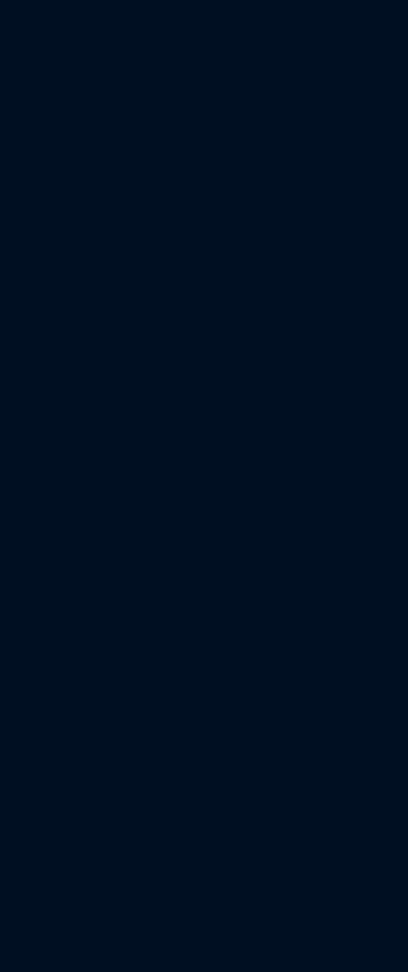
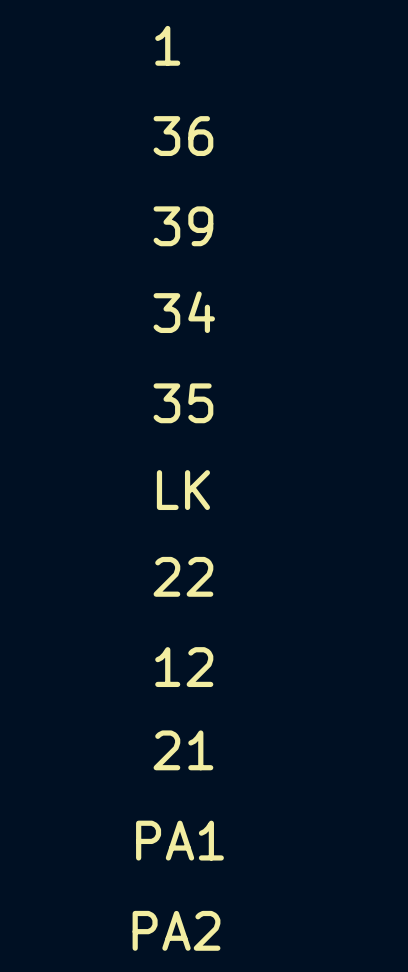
text: none -> 1 (167, 45)
text: none -> 36 (183, 136)
text: none -> 39 (183, 226)
text: none -> 34 (184, 312)
text: none -> 35 (183, 403)
text: none -> LK (183, 490)
text: none -> 22 (183, 576)
text: none -> 12 (184, 667)
text: none -> 21 (183, 750)
text: none -> PA1 (179, 840)
text: none -> PA2 (176, 930)

